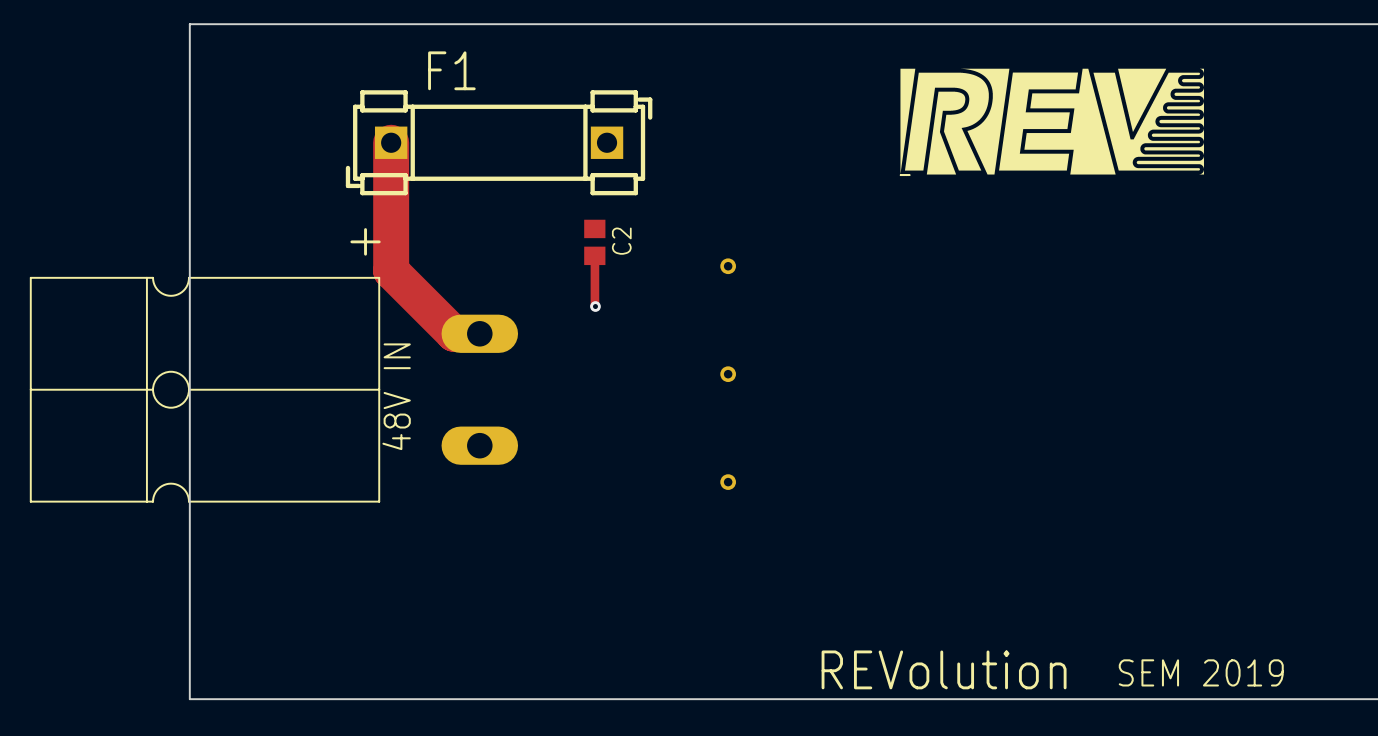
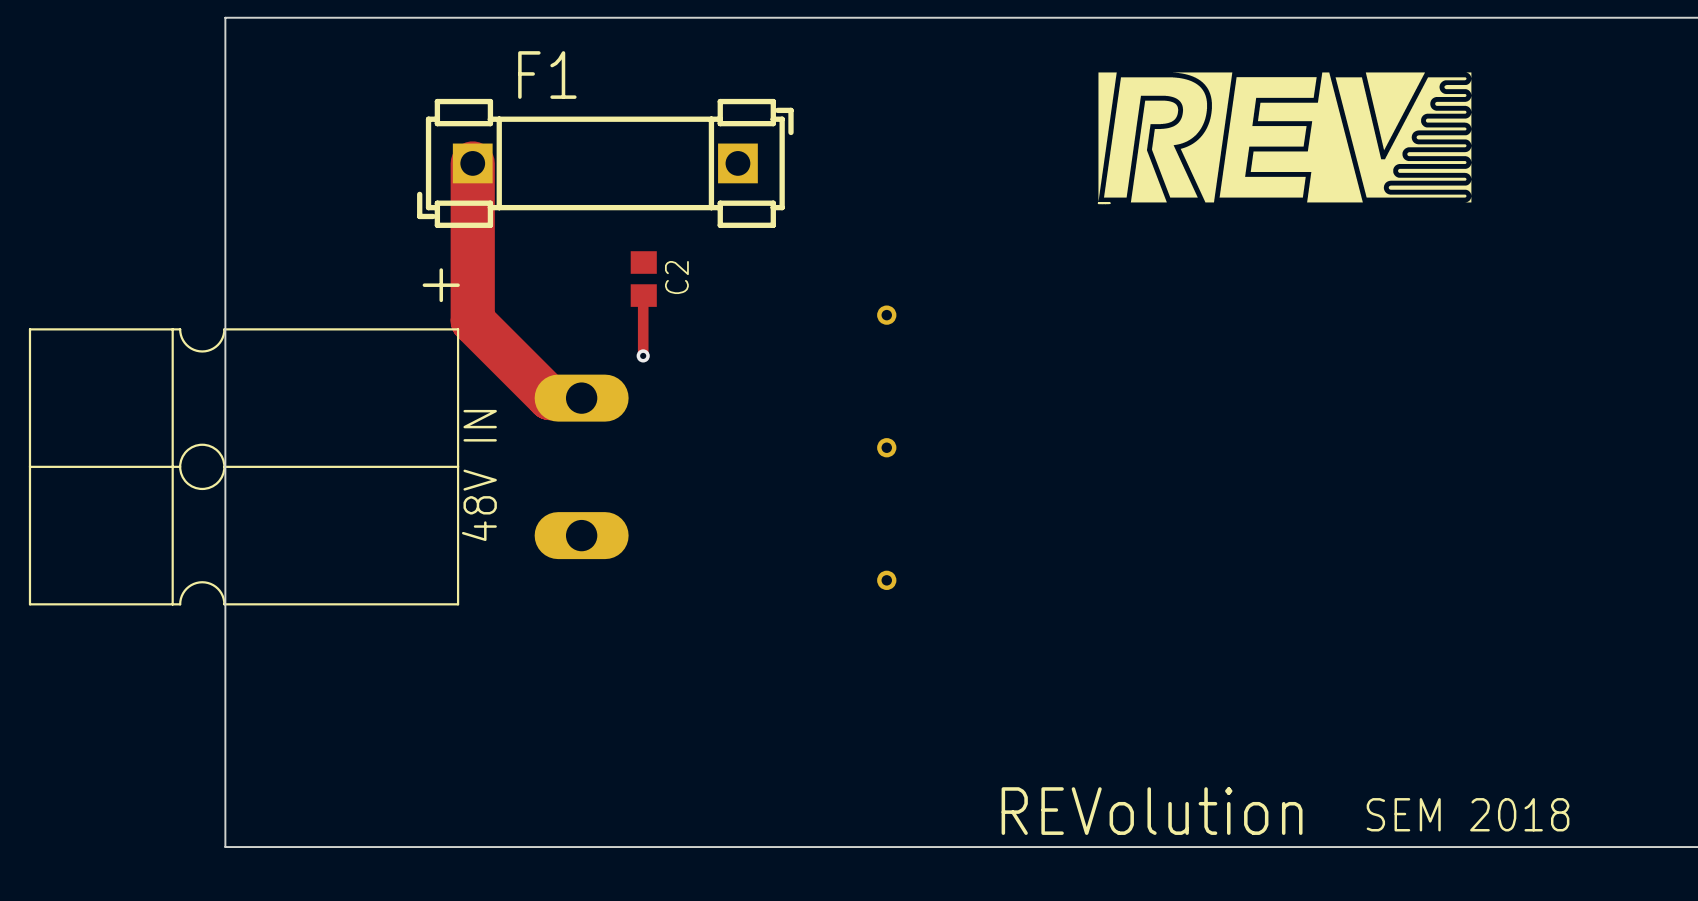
C2 position: (594, 242) -> (643, 279)
track: none -> (643, 295) (643, 355)
track: (594, 255) (595, 306) -> none
via position: (595, 306) -> (643, 355)
text: SEM 2019 (1201, 672) -> SEM 2018 (1468, 814)

